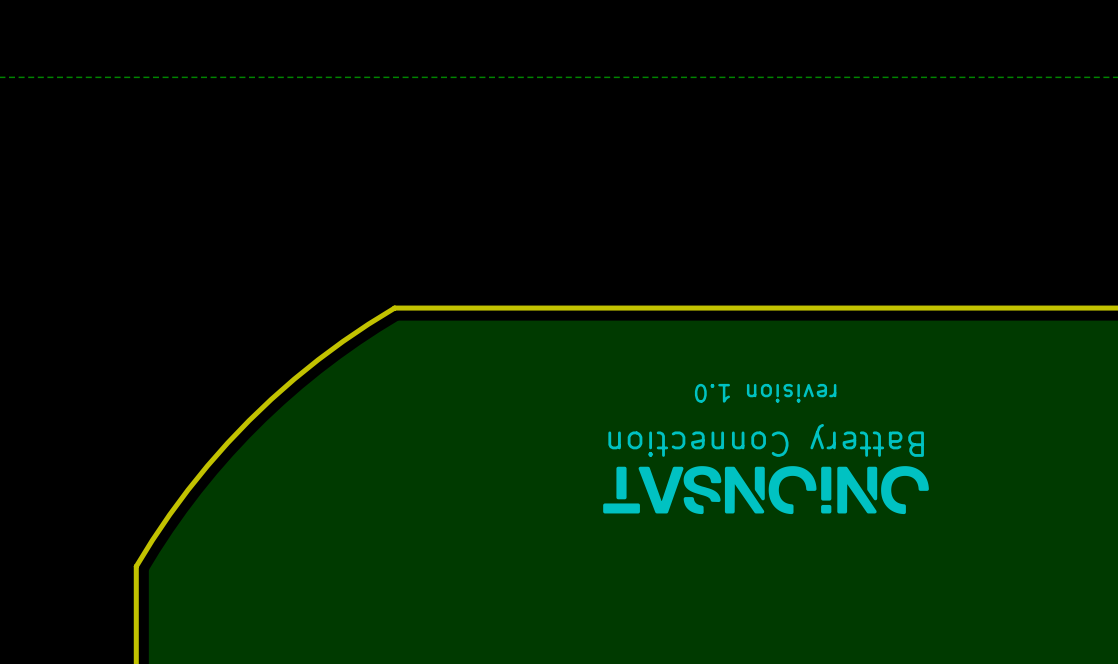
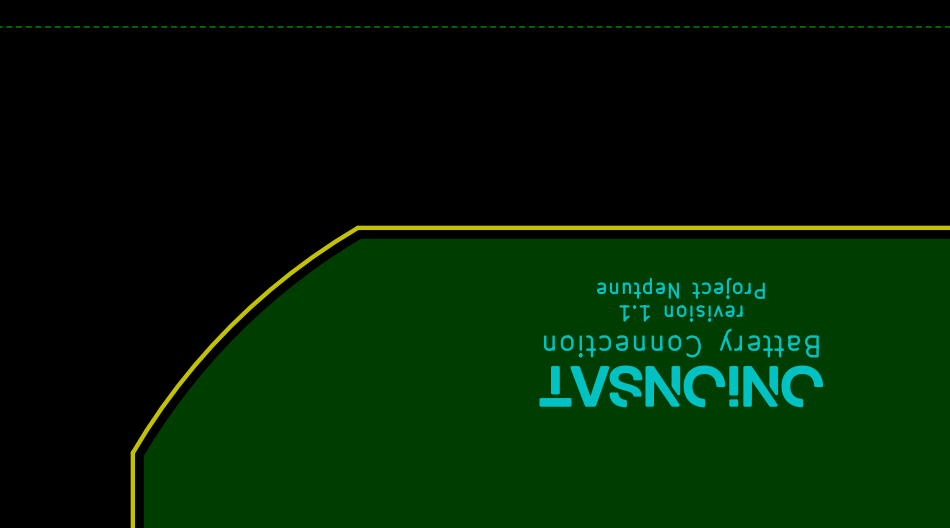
text: none -> Project Neptune (680, 288)
text: revision 1.0 (765, 393) -> revision 1.1 (680, 313)

